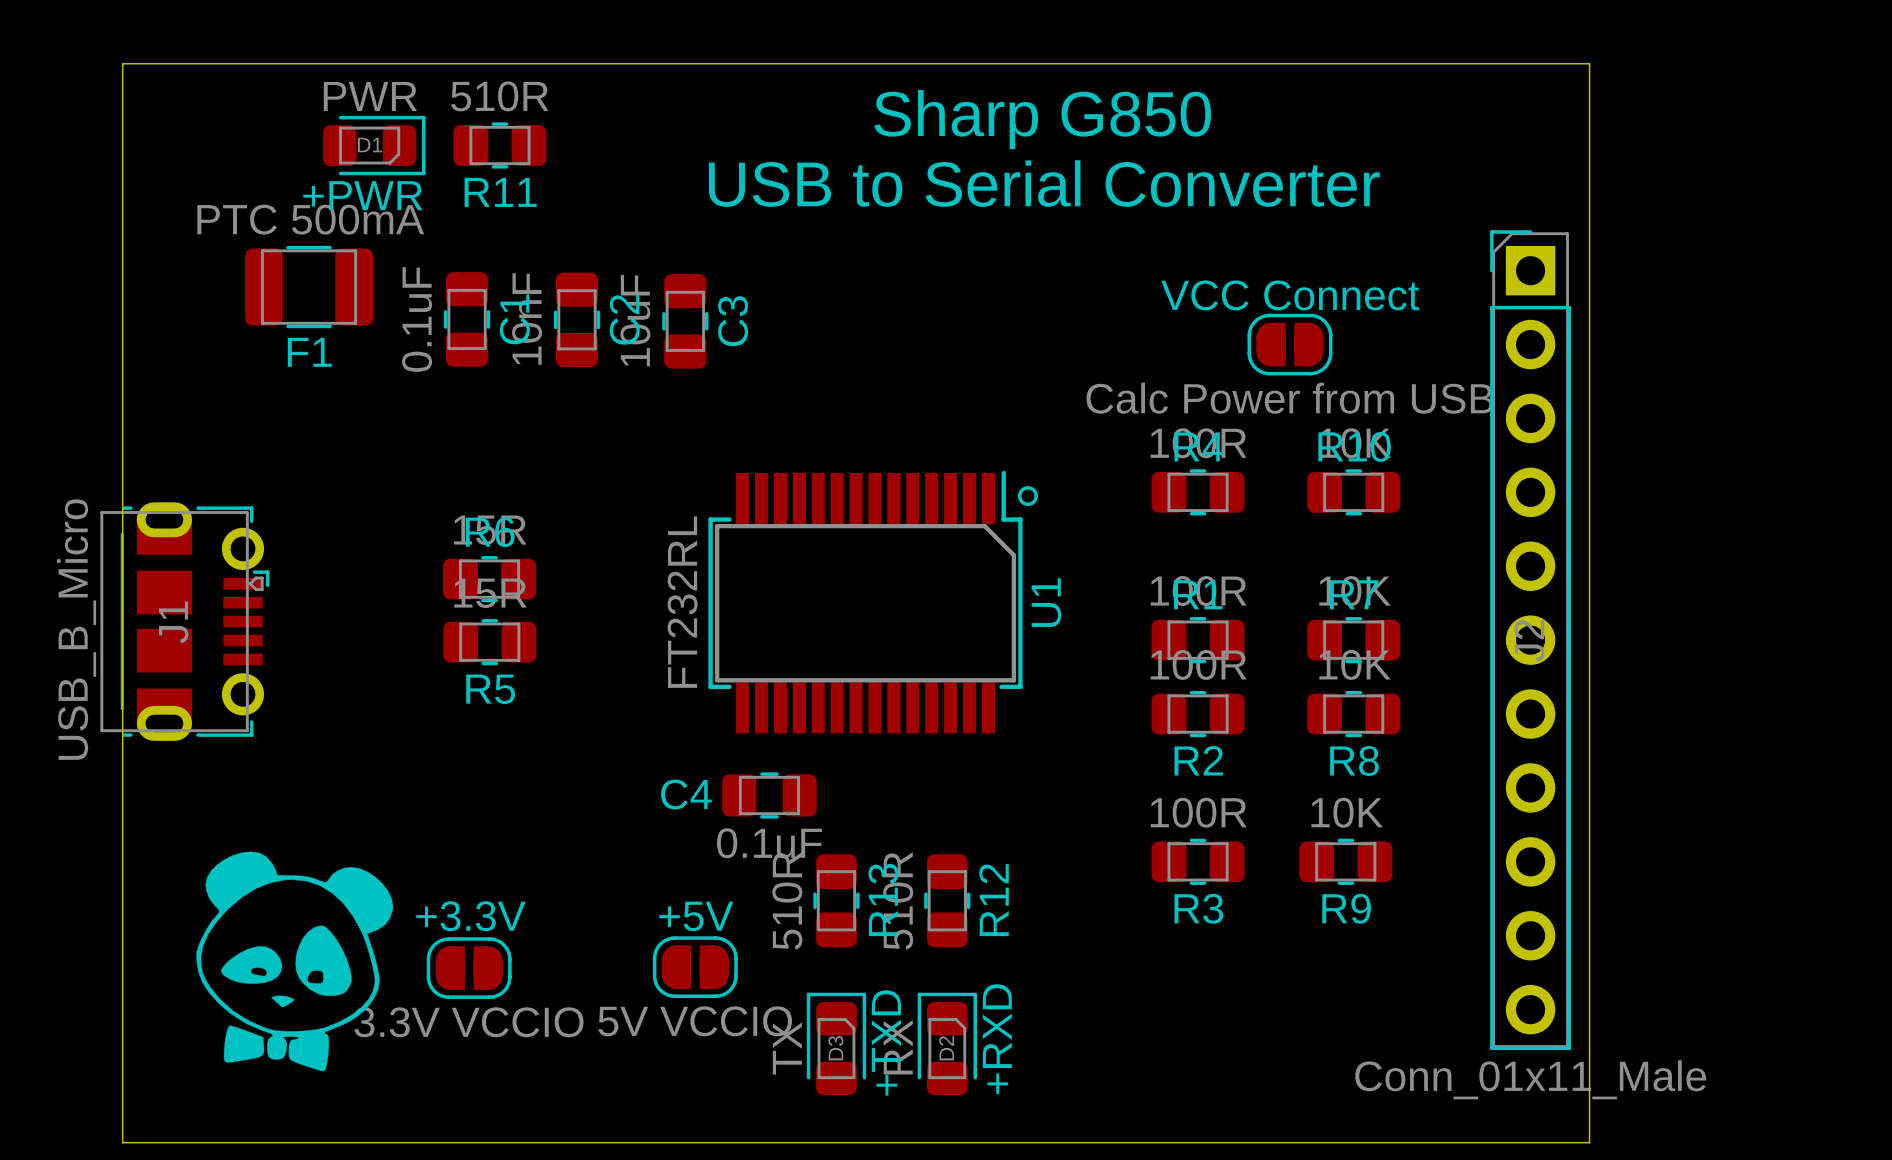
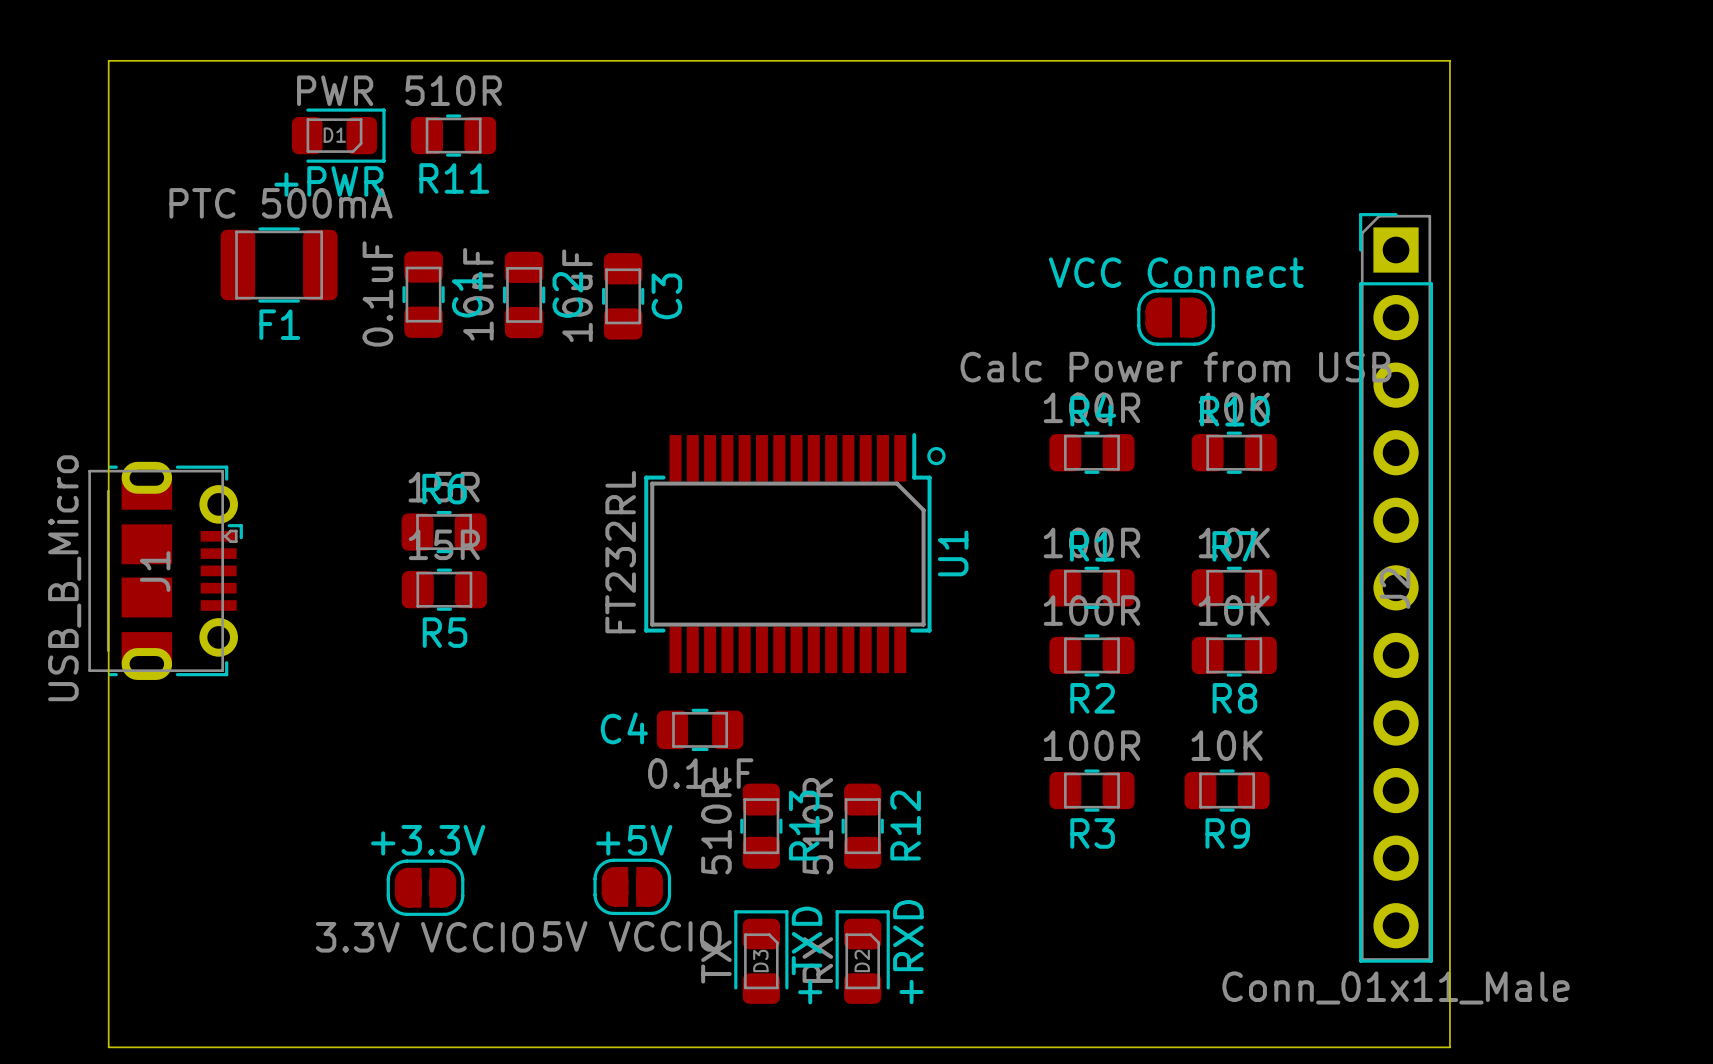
text: Sharp G850 (1042, 119) -> none
text: USB to Serial Converter (1044, 183) -> none
drawing: [196, 851, 394, 1072] -> none

